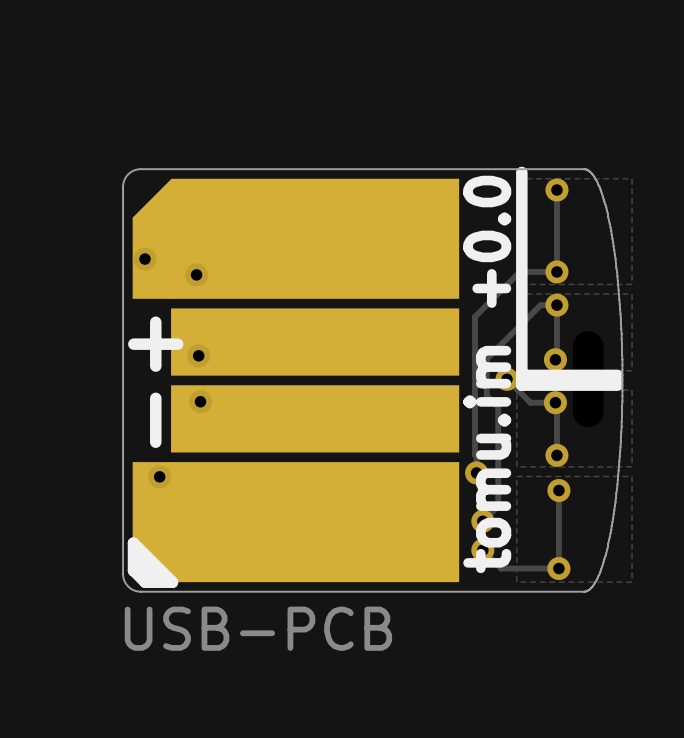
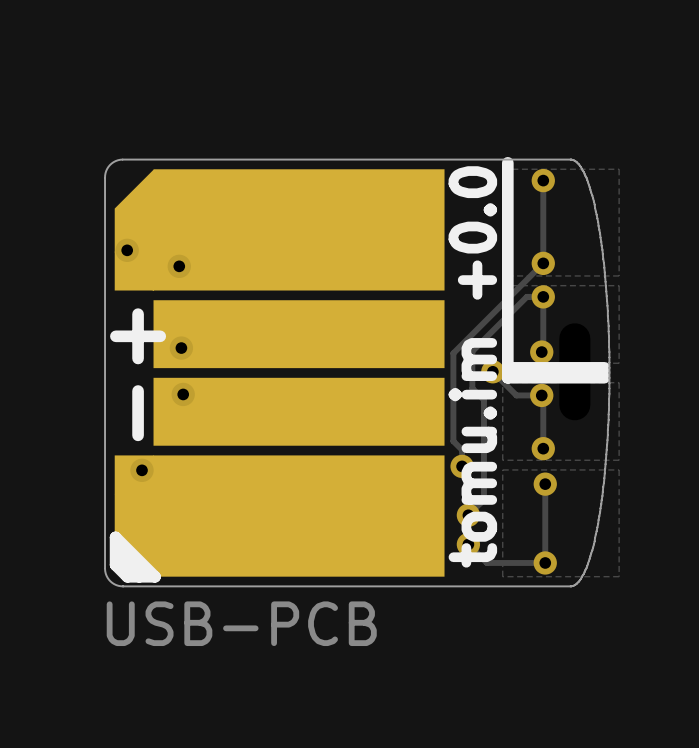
track: (556, 271) (519, 271) (475, 316) (475, 455) -> (543, 263) (453, 353) (453, 441) (460, 448)

